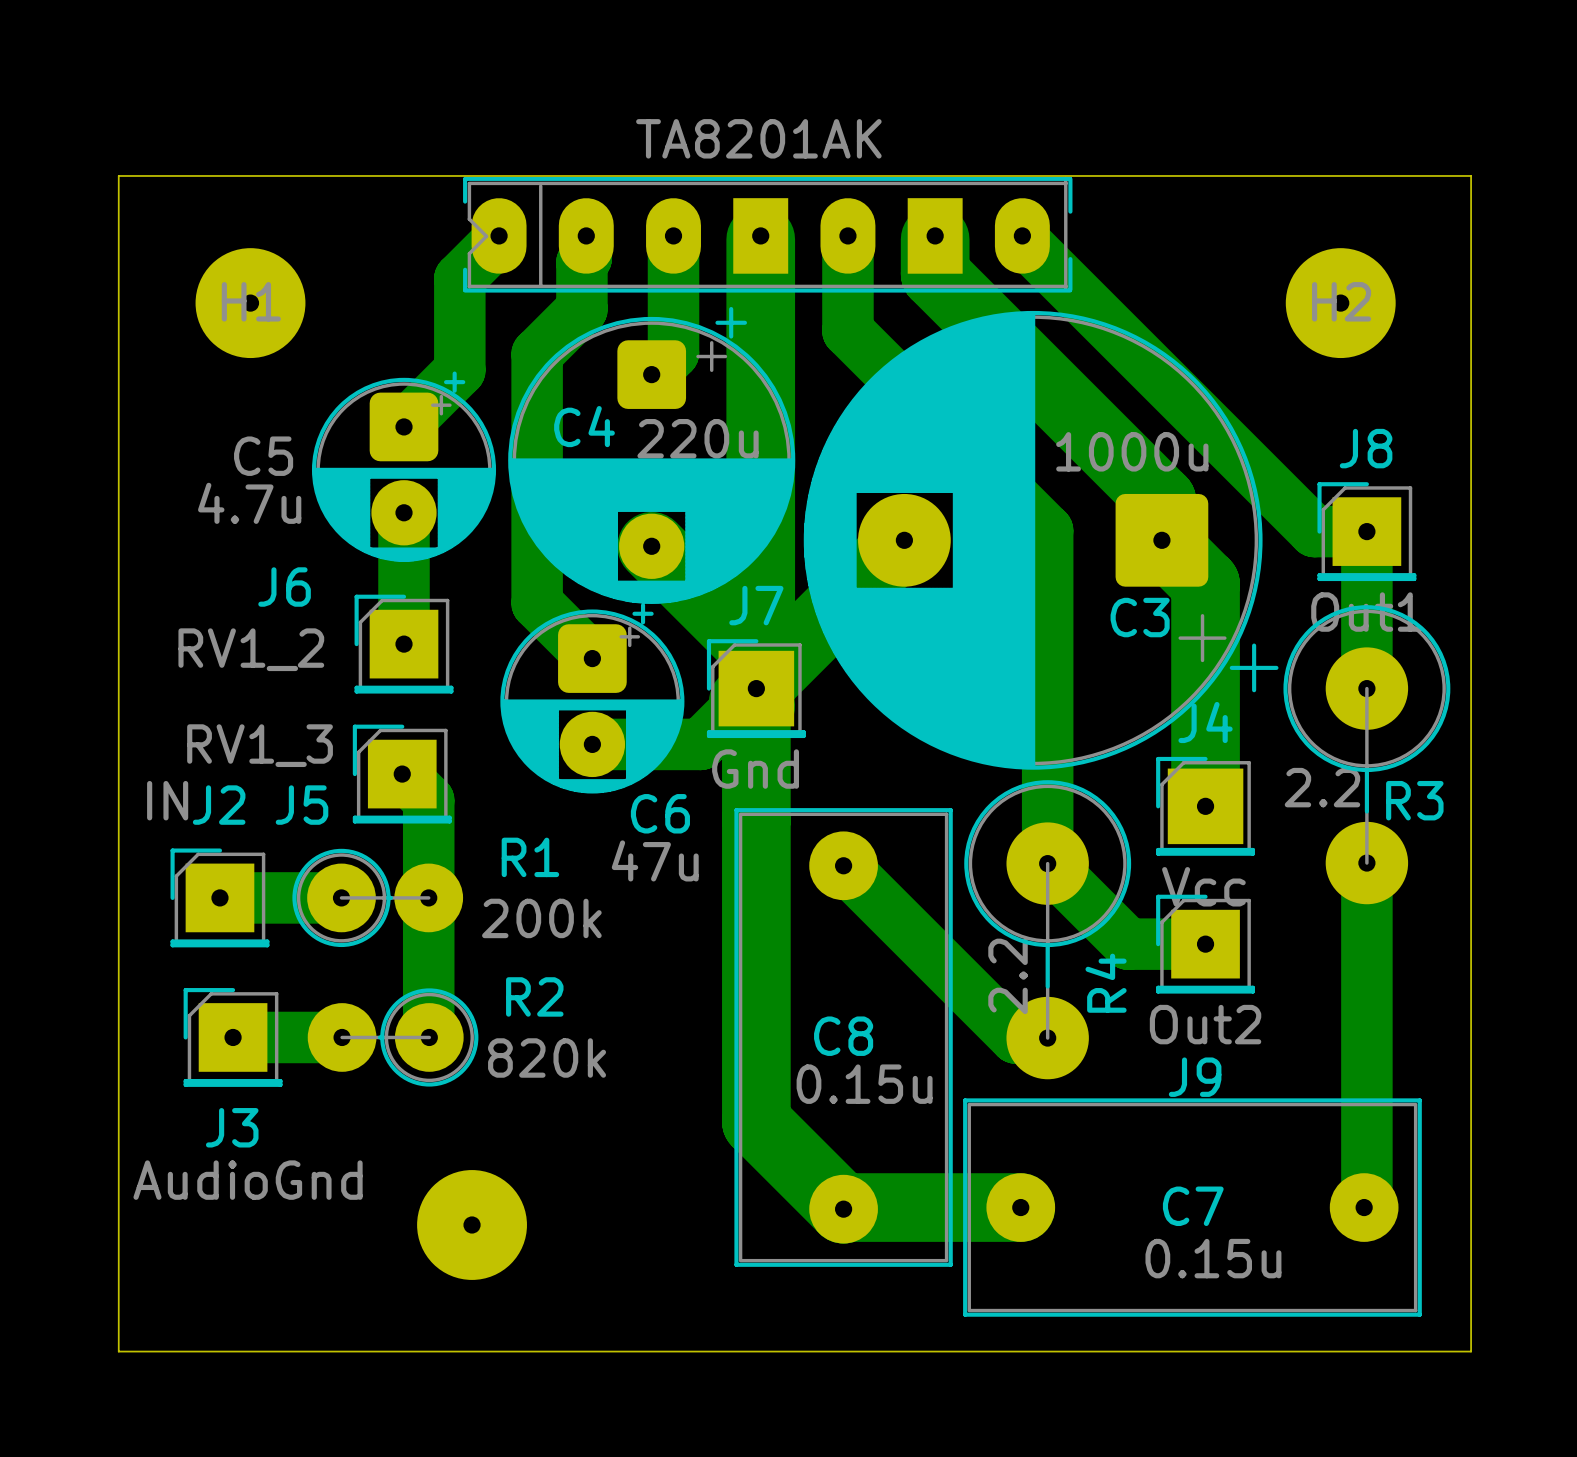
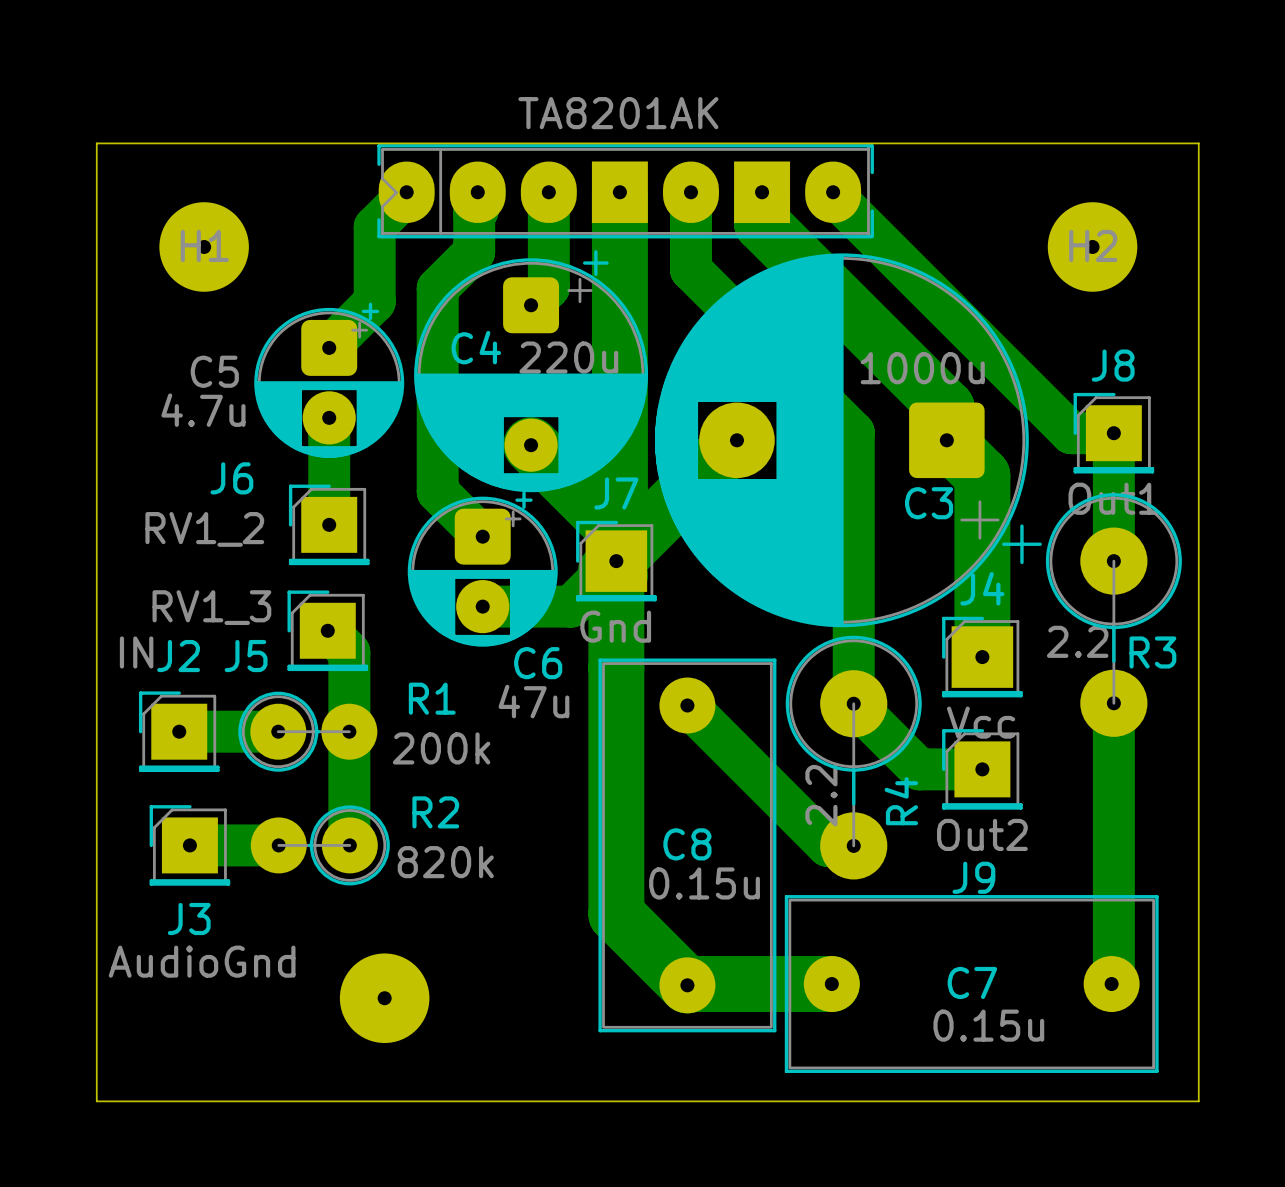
part footprint: [463, 176, 1073, 293] -> [377, 143, 874, 239]

